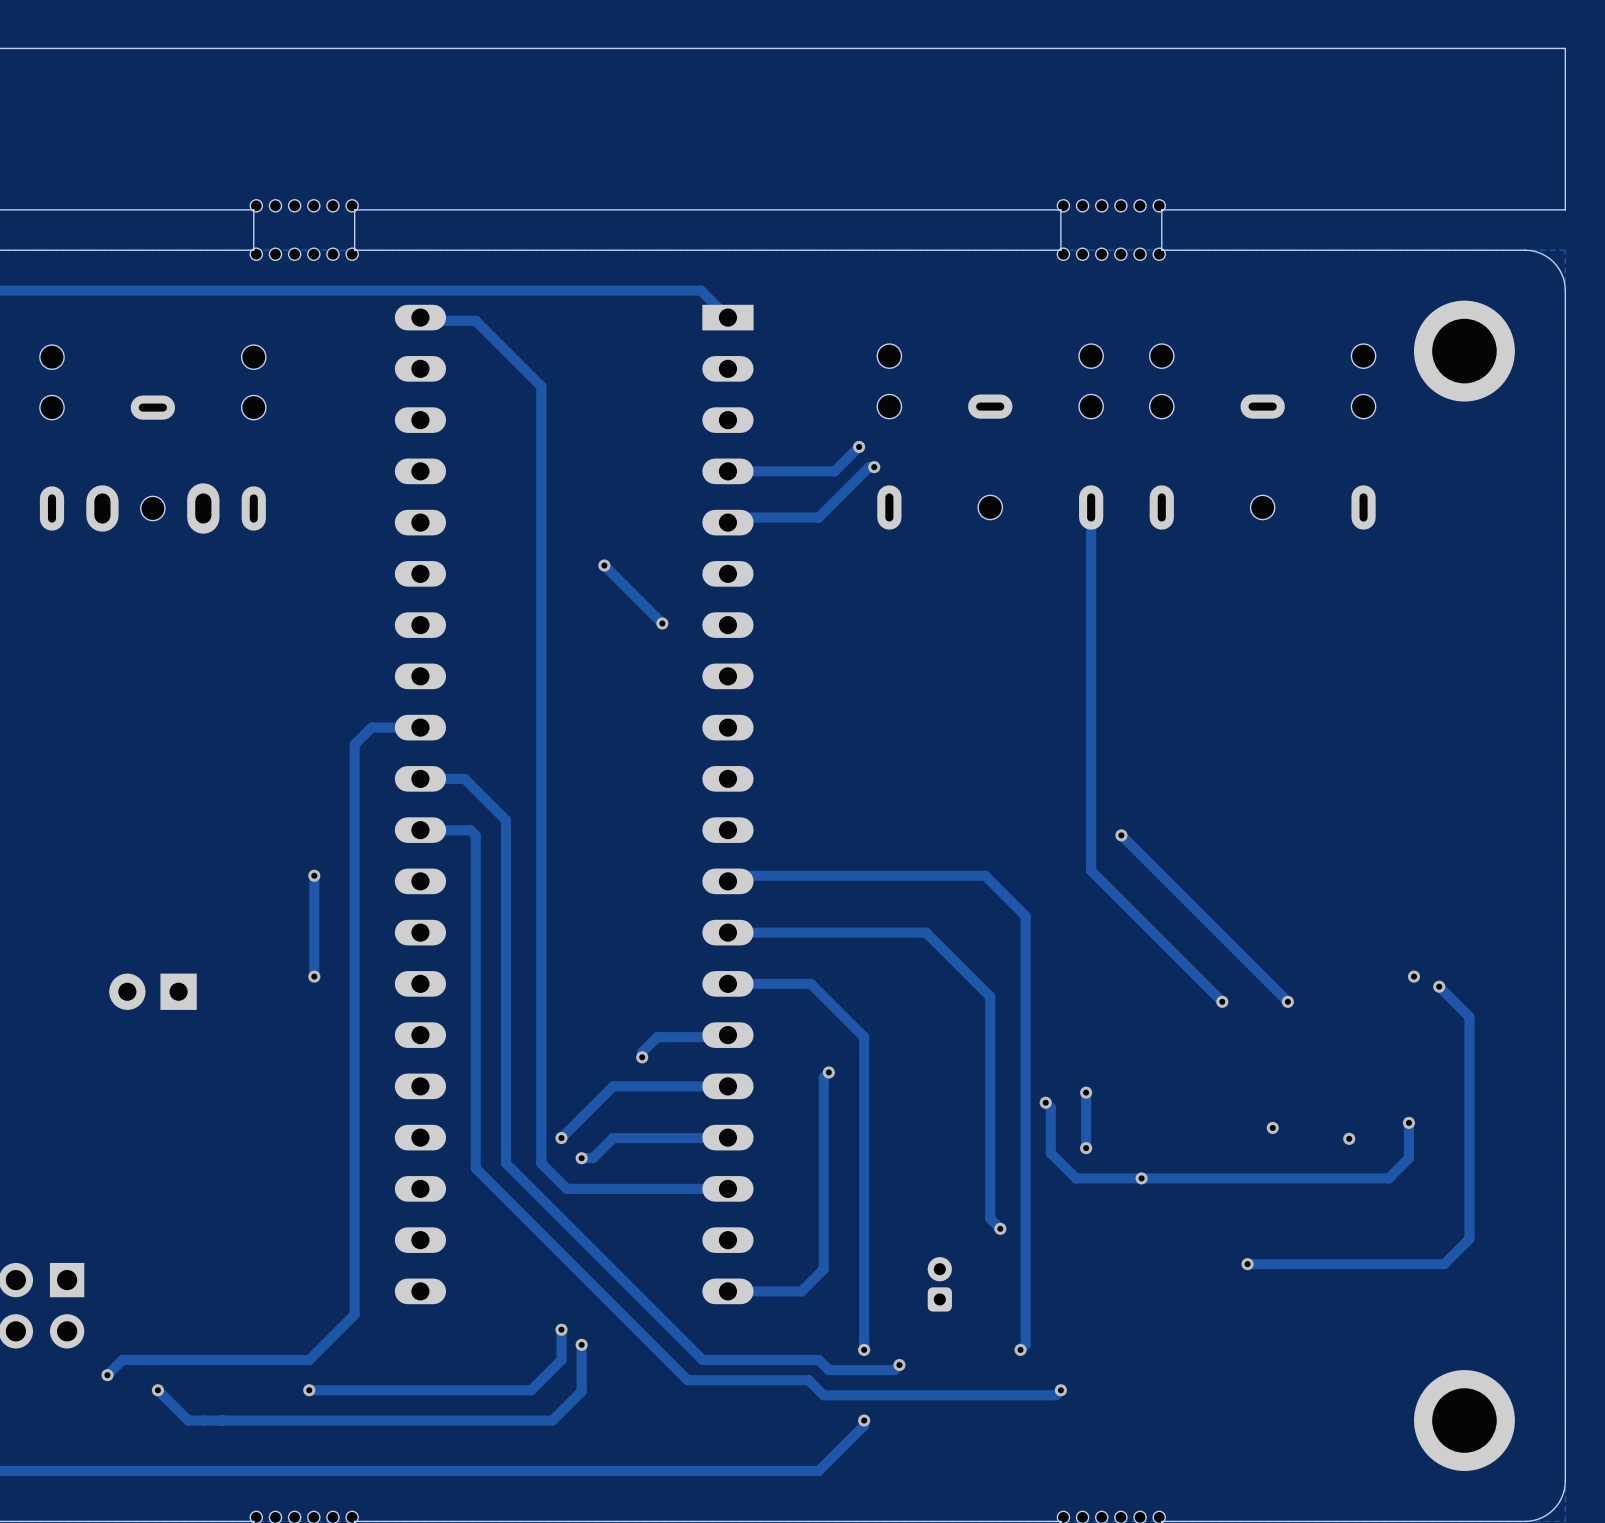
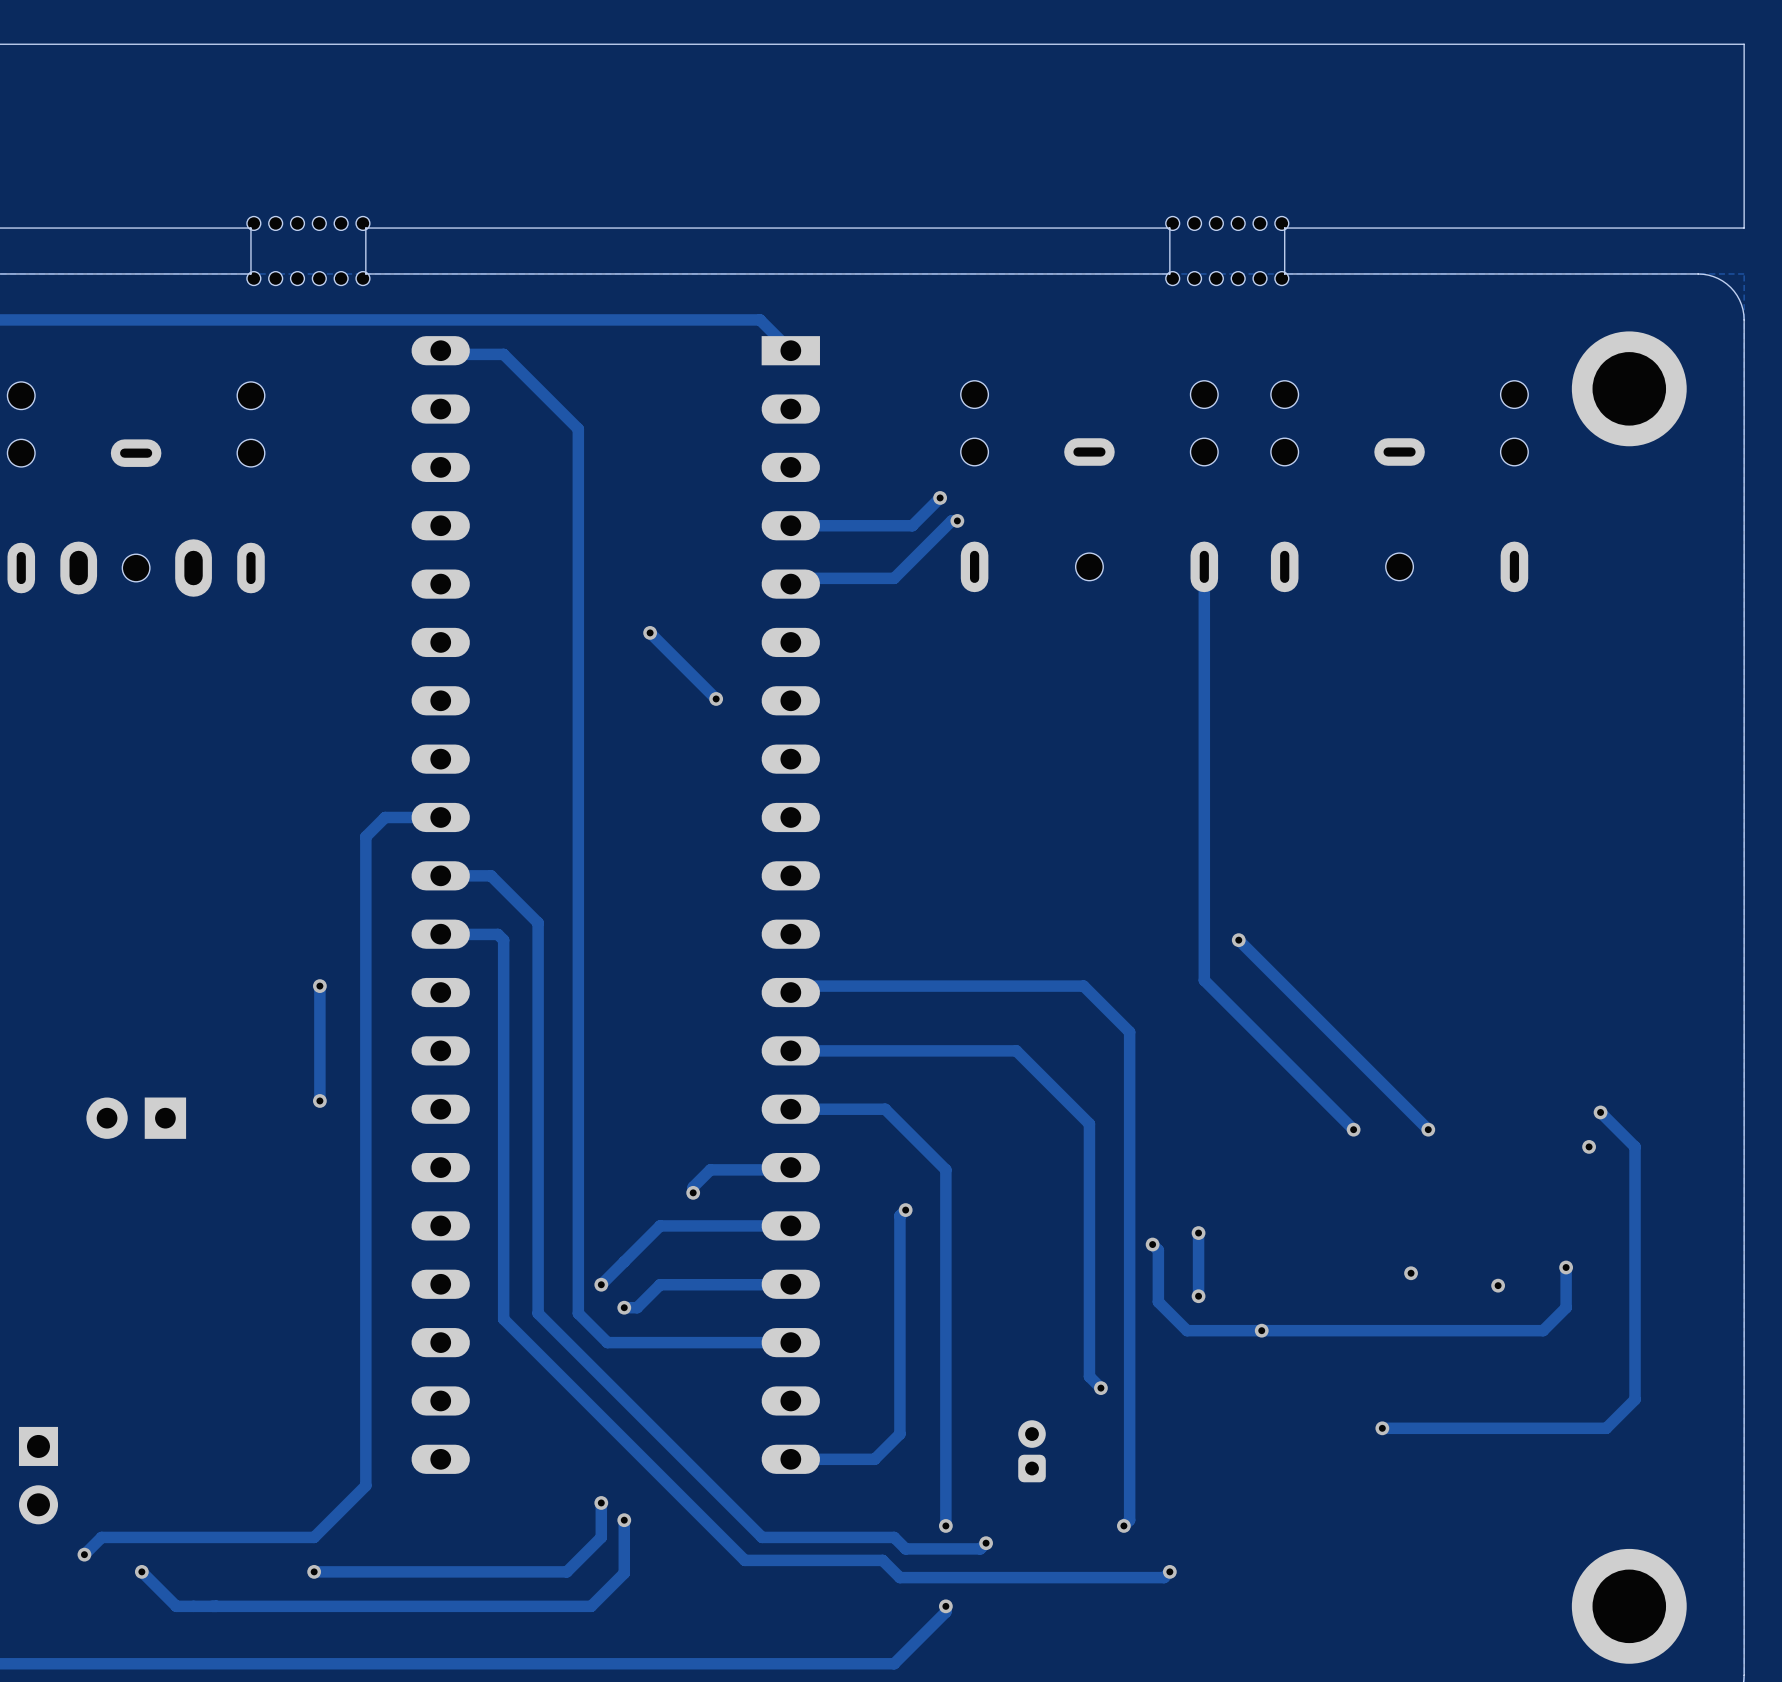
via position: (1414, 976) -> (1589, 1146)

